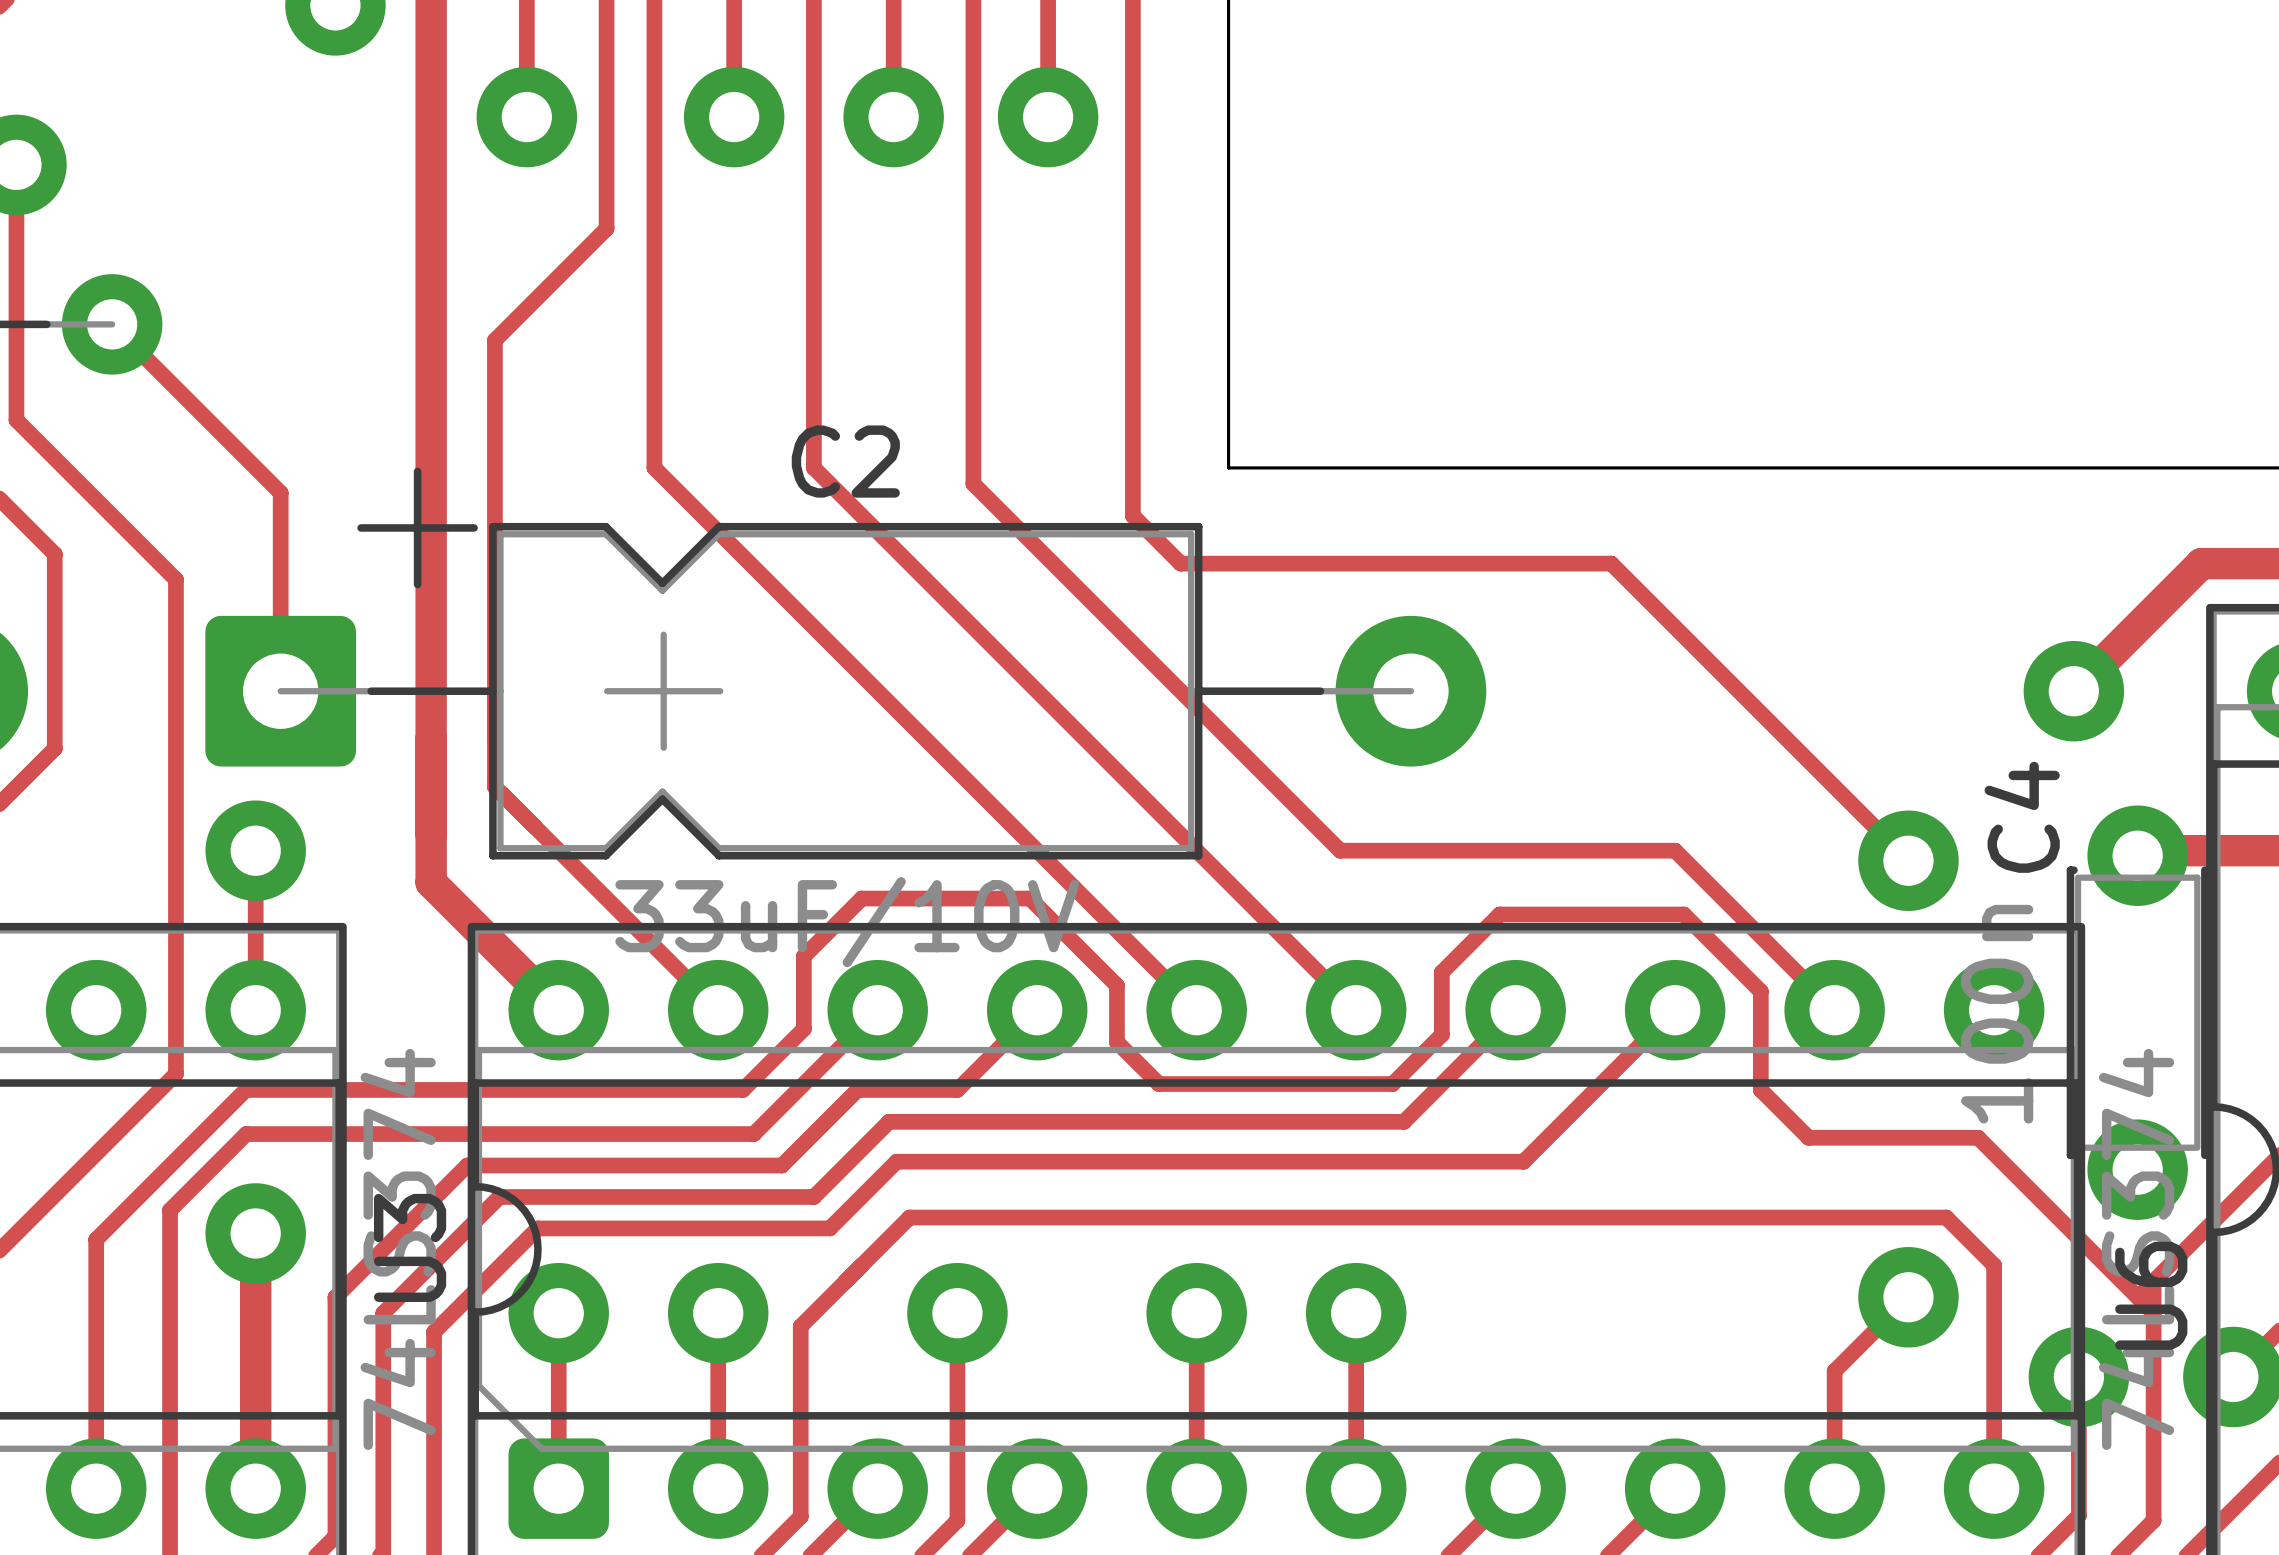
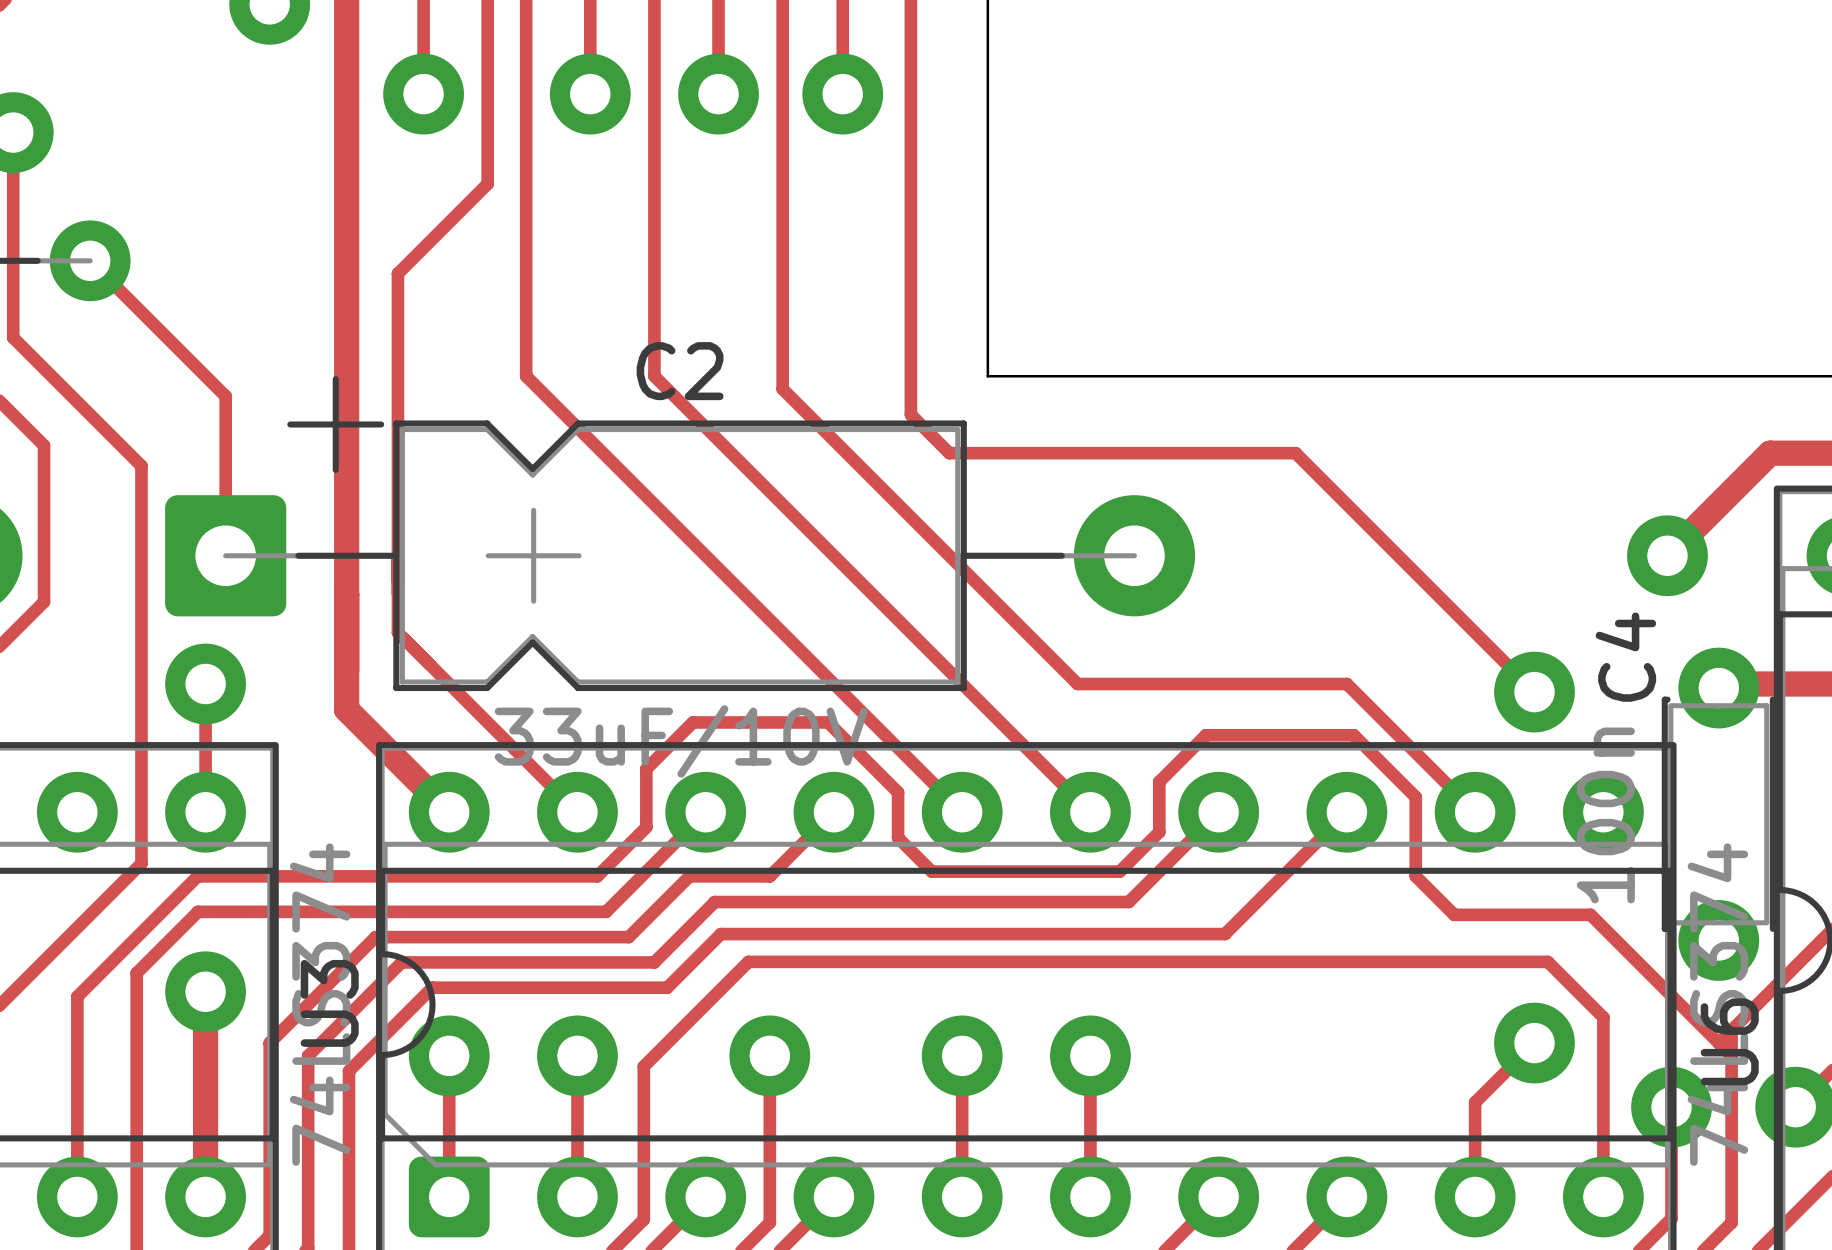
track: (909, 1217) (1946, 1217) -> (731, 978) (748, 961) (1547, 961) (1564, 978)

